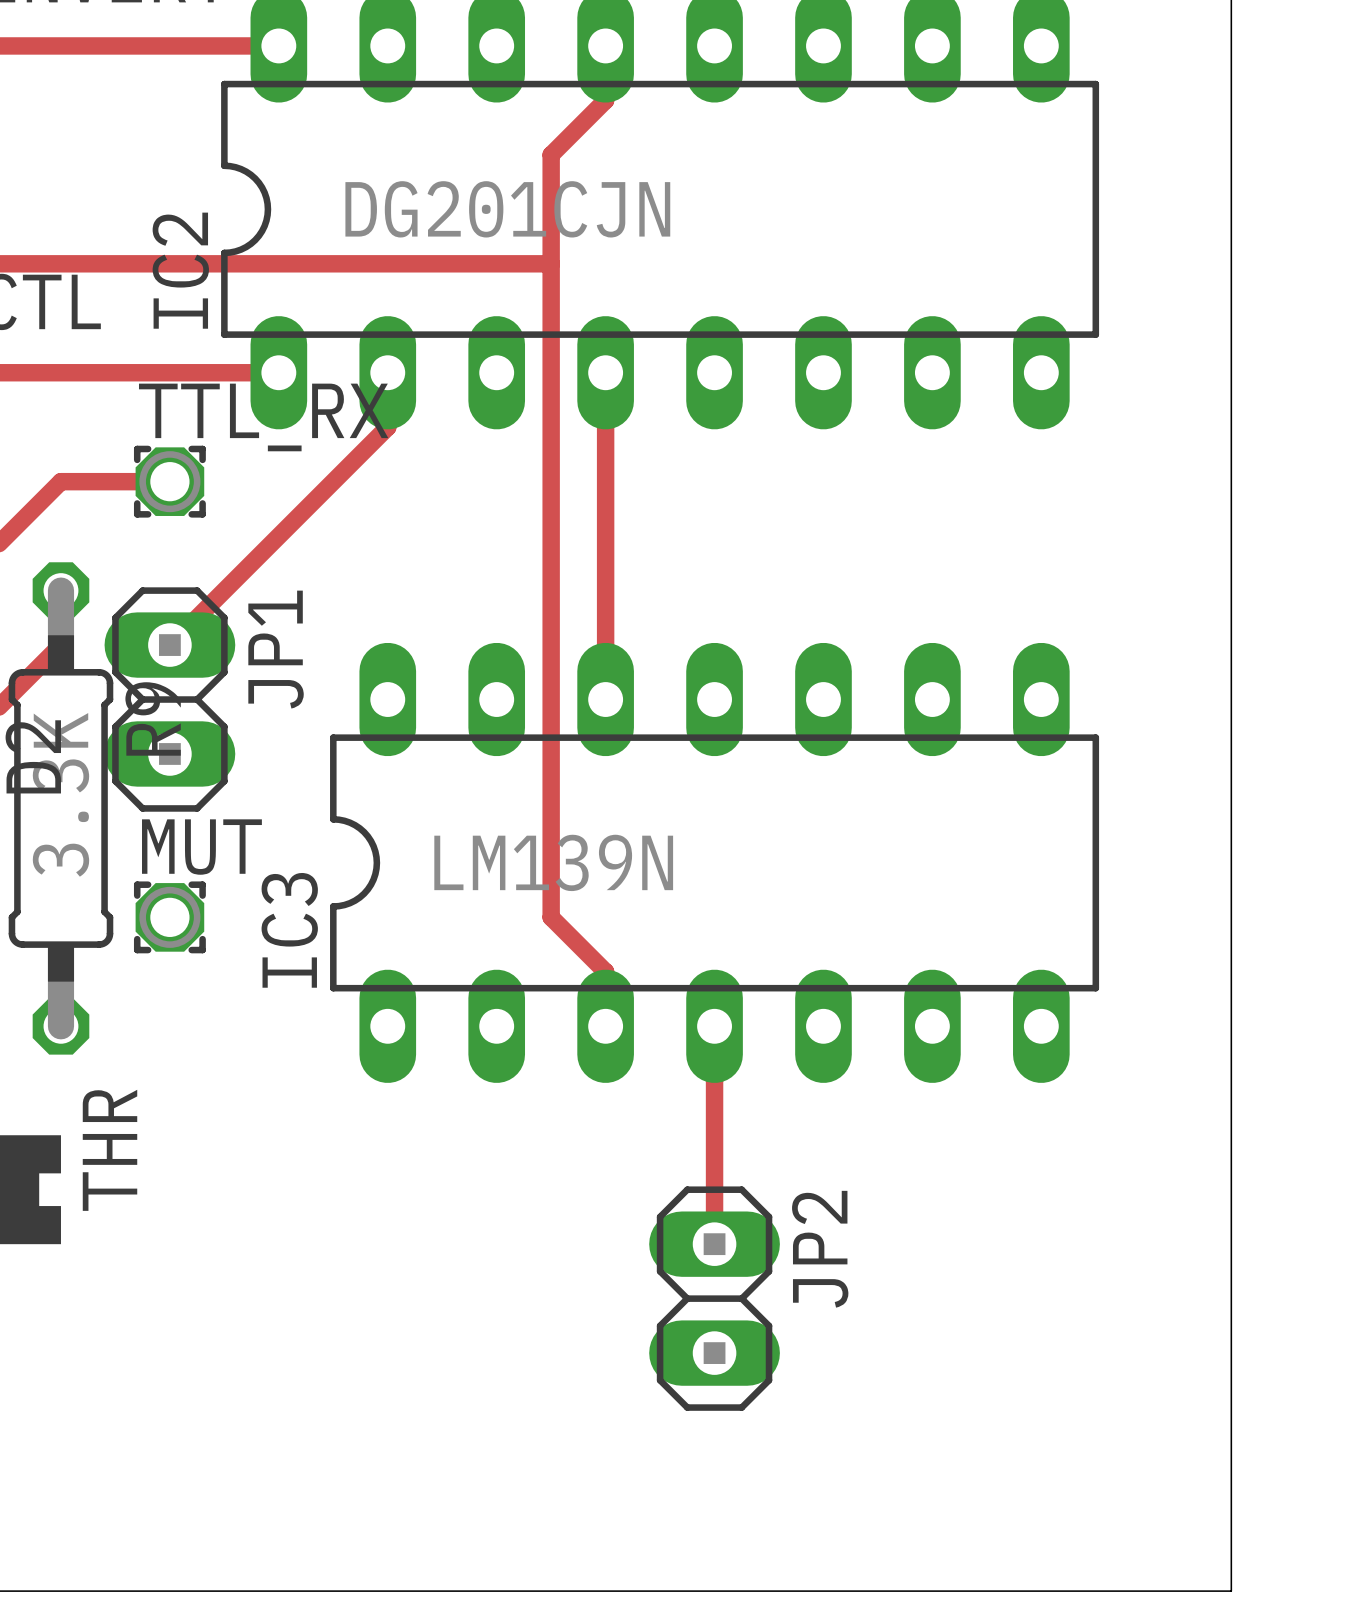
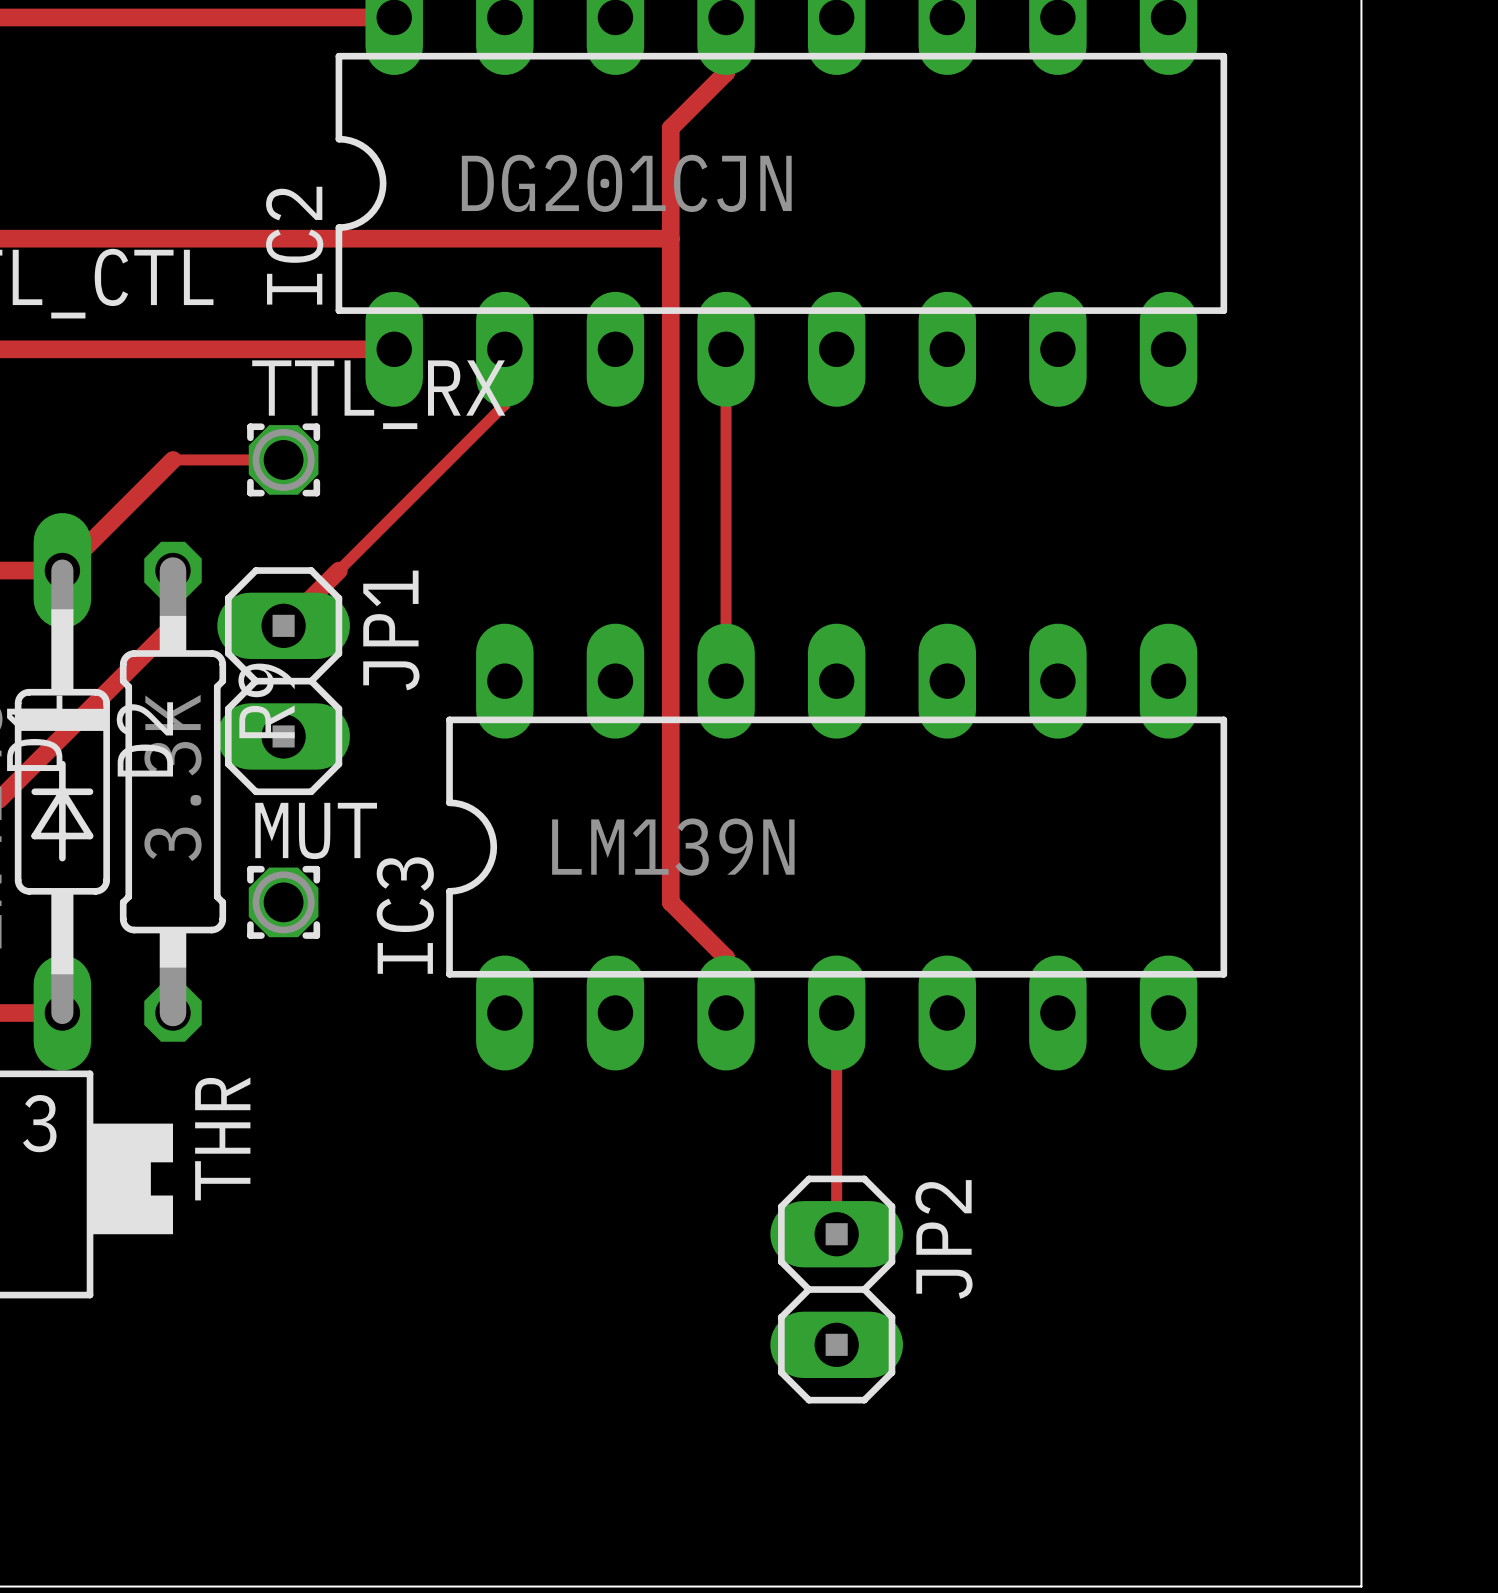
track width: thick (387, 372) (387, 427) (224, 590) -> thin (504, 349) (504, 404) (338, 570)
track width: thick (605, 372) (605, 699) -> thin (726, 349) (726, 681)
track width: thick (60, 481) (169, 481) -> thin (172, 459) (283, 459)
track width: thick (714, 1026) (714, 1244) -> thin (836, 1013) (836, 1234)

